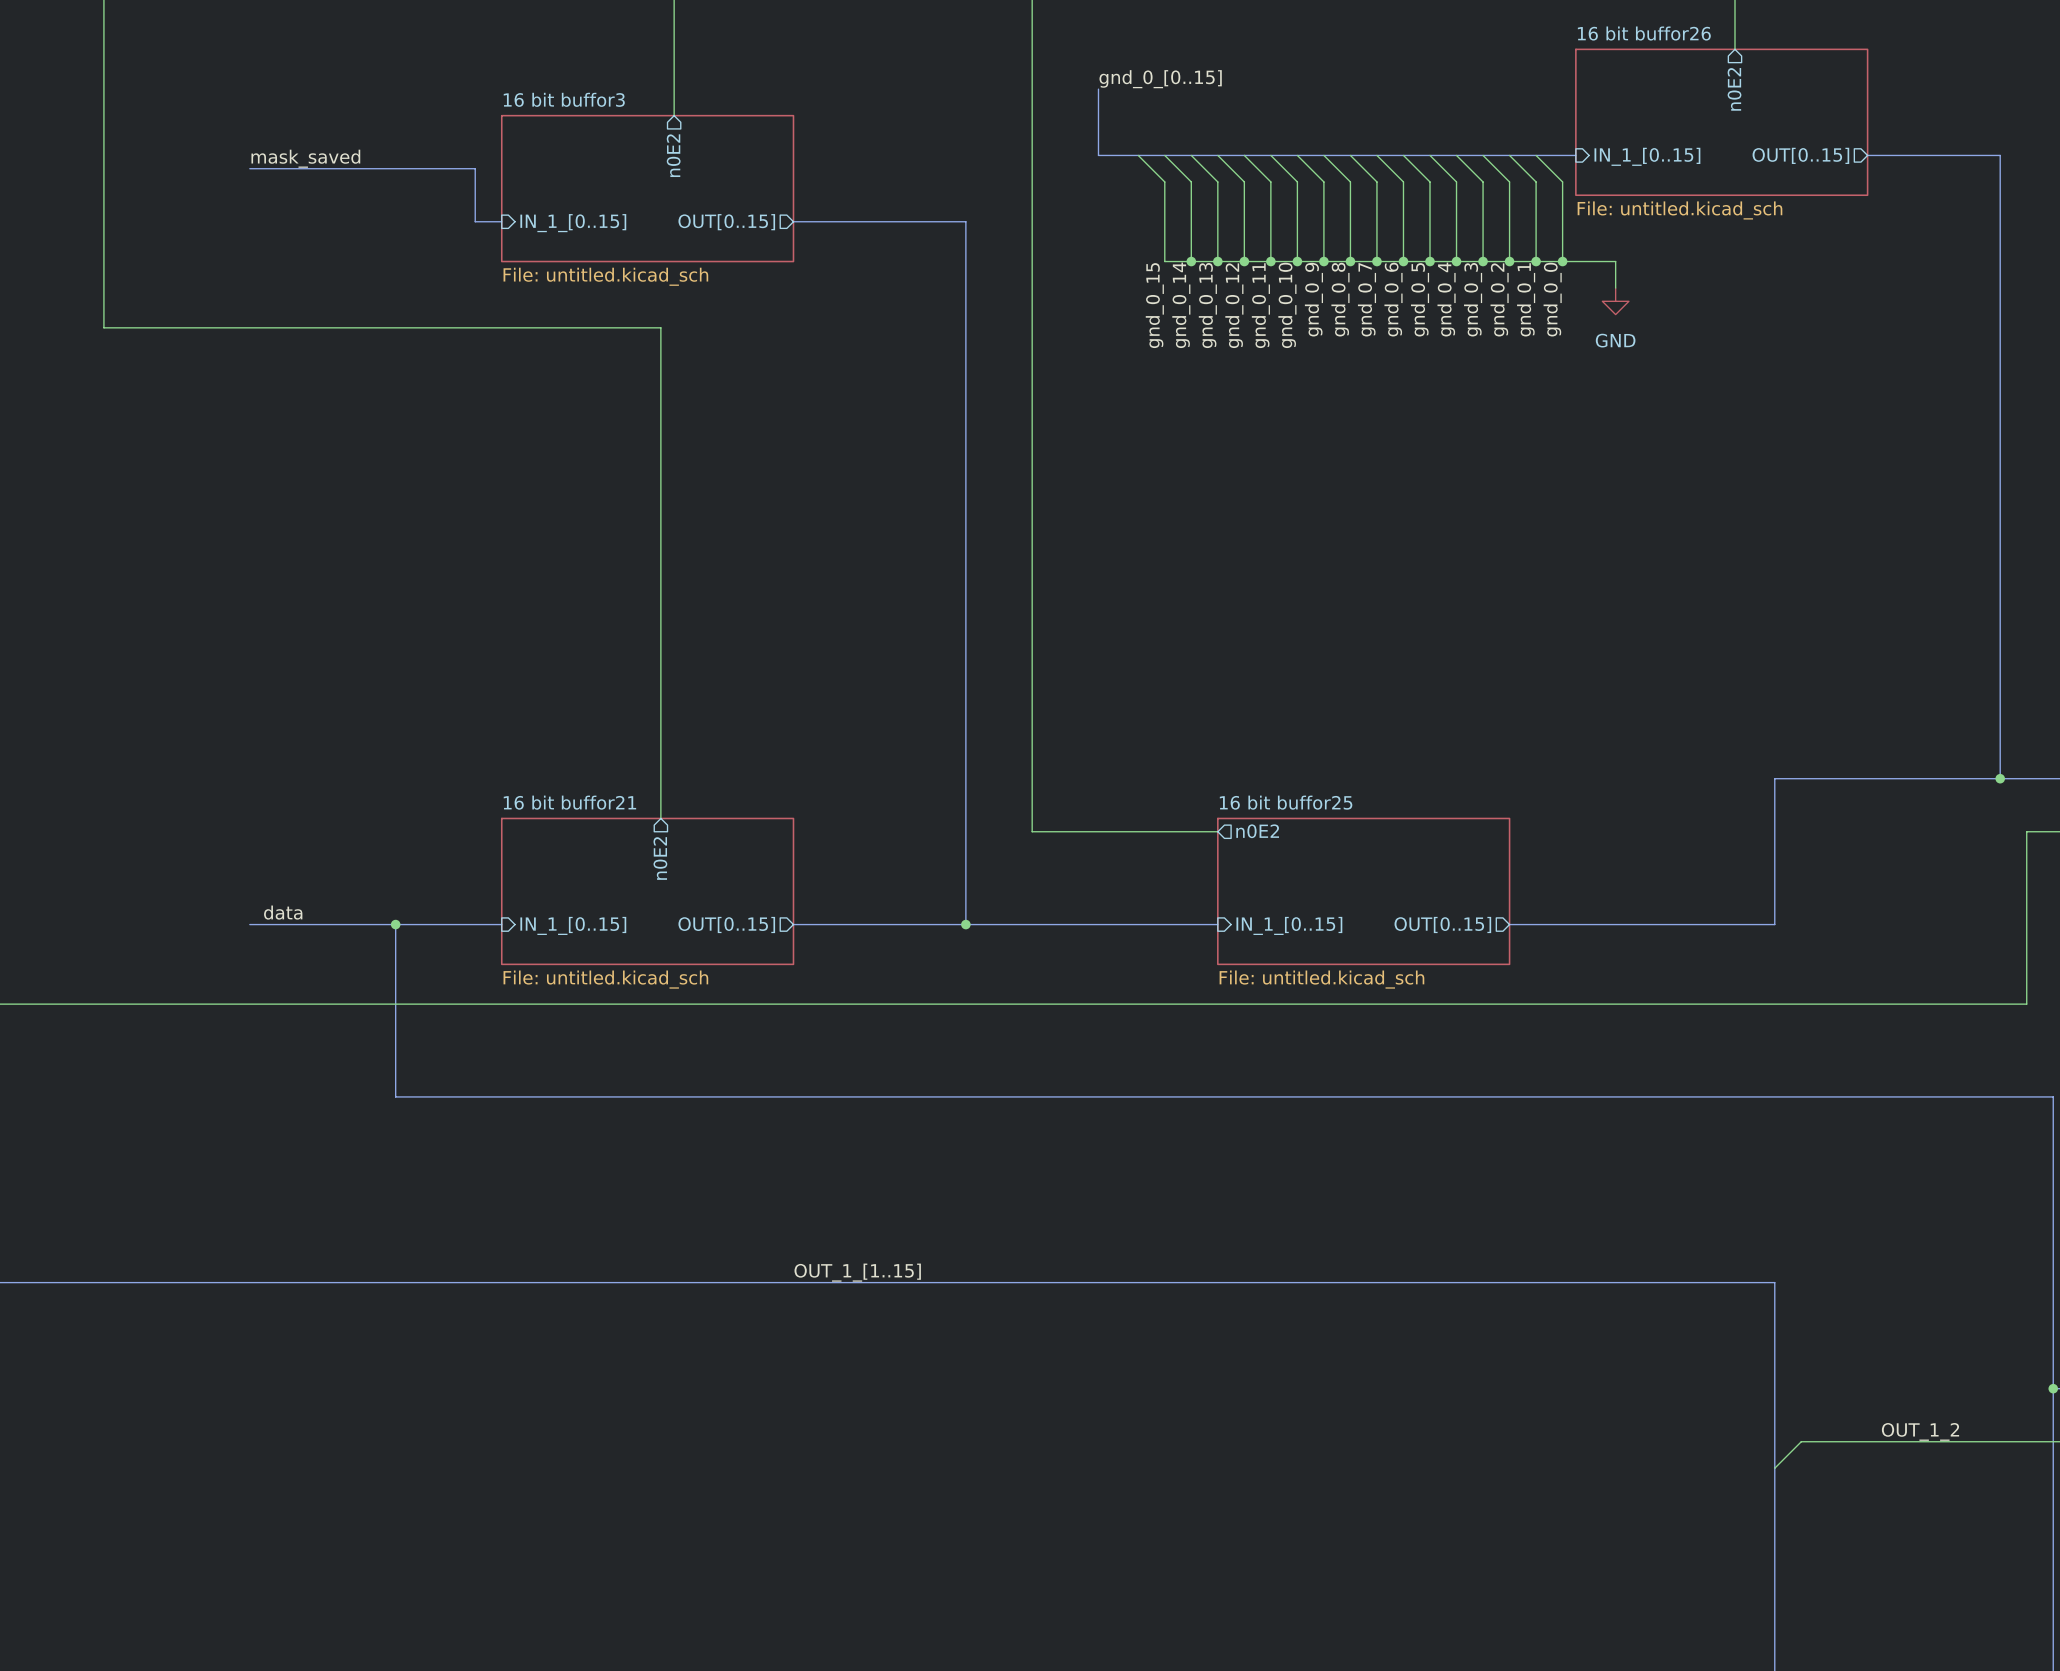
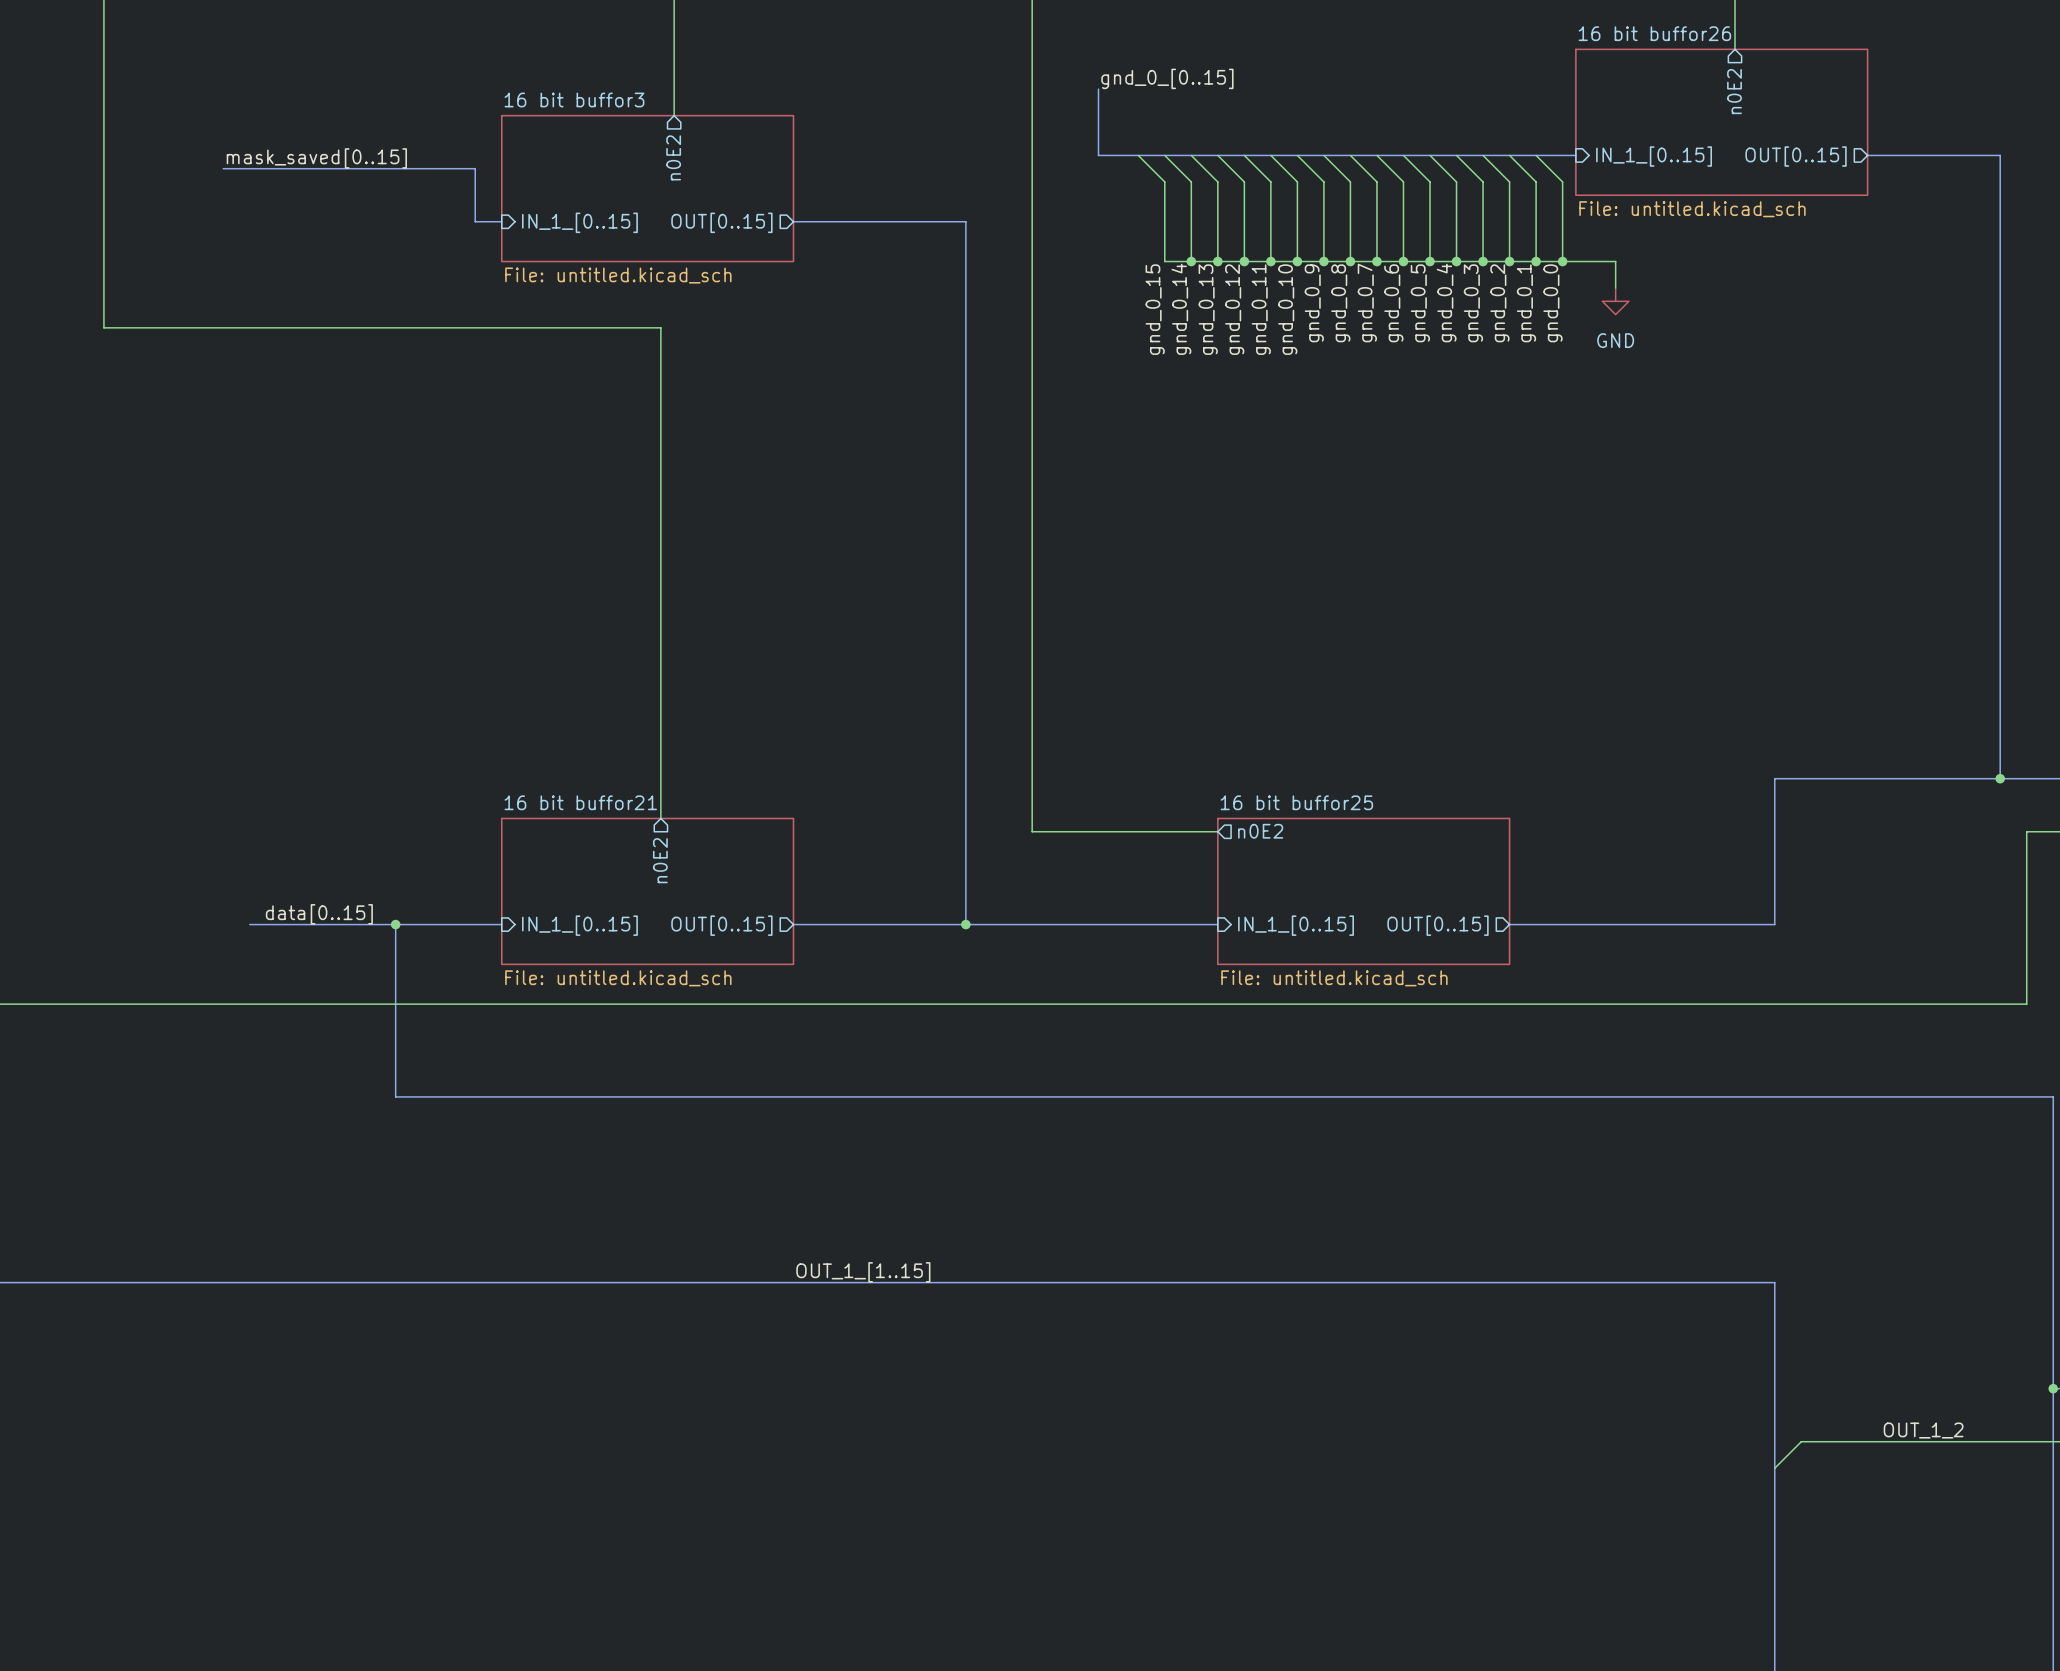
label: mask_saved (305, 158) -> mask_saved[0..15] (316, 158)
bus: none -> (223, 168) (249, 168)
label: data (283, 912) -> data[0..15] (319, 914)

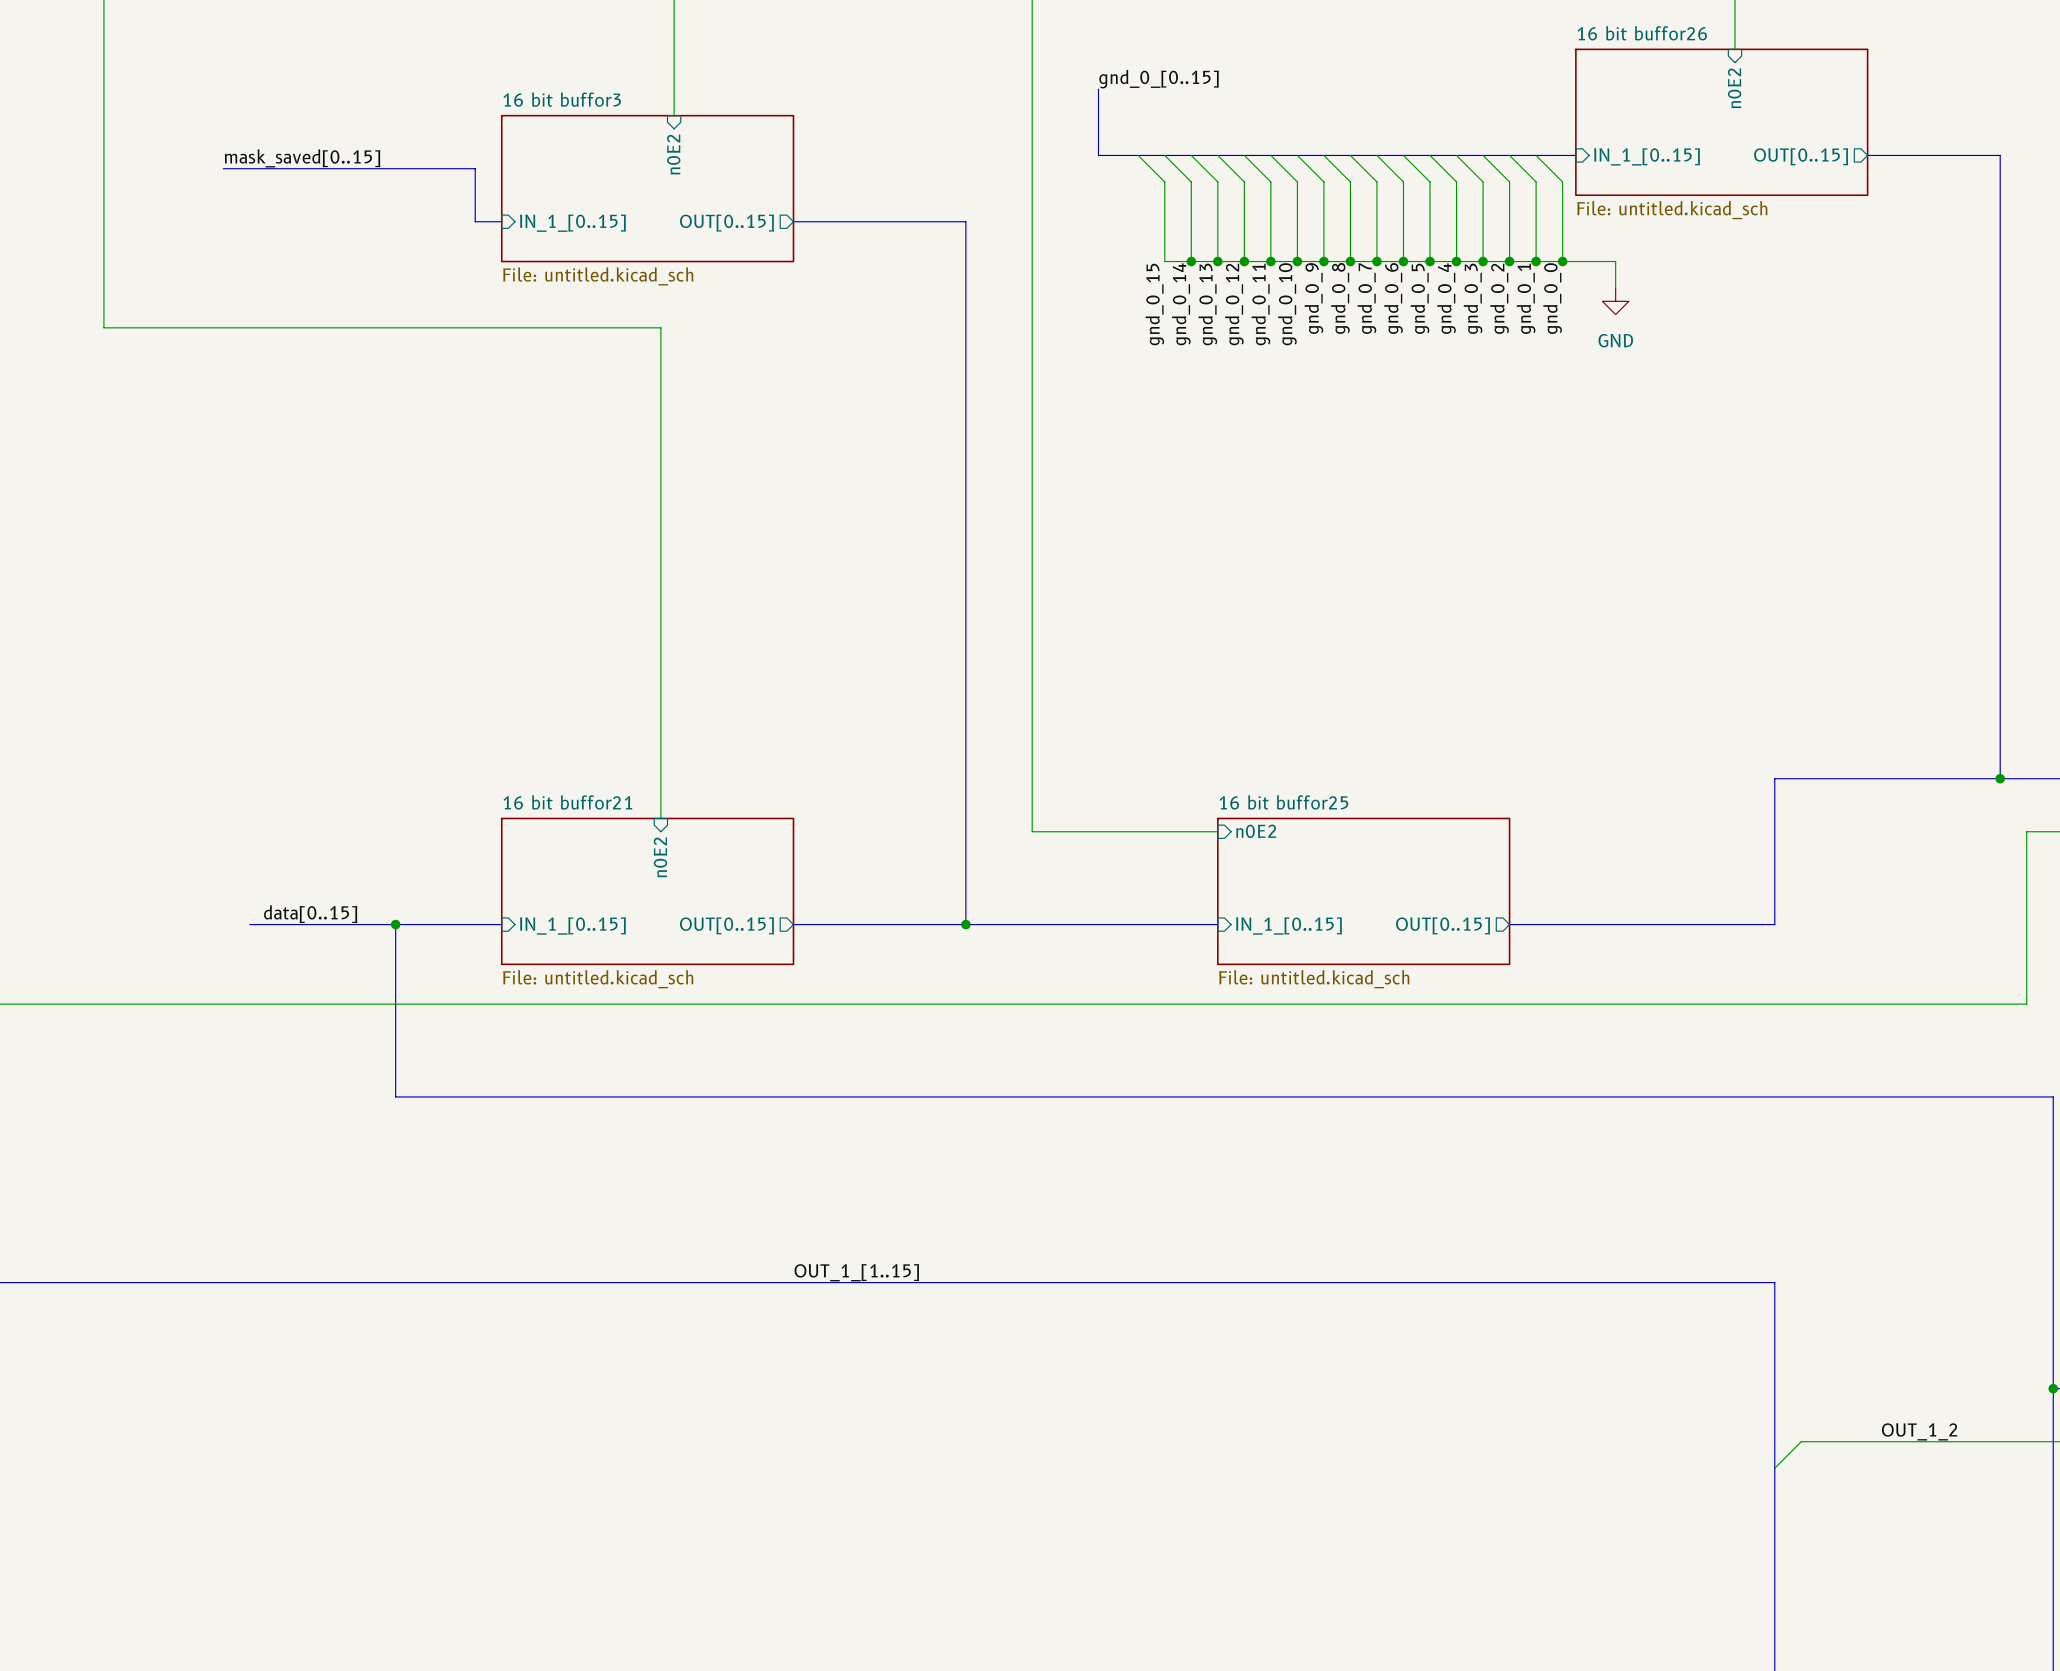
sheet pin shape: output (1734, 91) -> input (1734, 88)
sheet pin shape: output (673, 157) -> input (673, 154)
sheet pin shape: output (1260, 831) -> input (1256, 831)
sheet pin shape: output (660, 860) -> input (660, 857)

